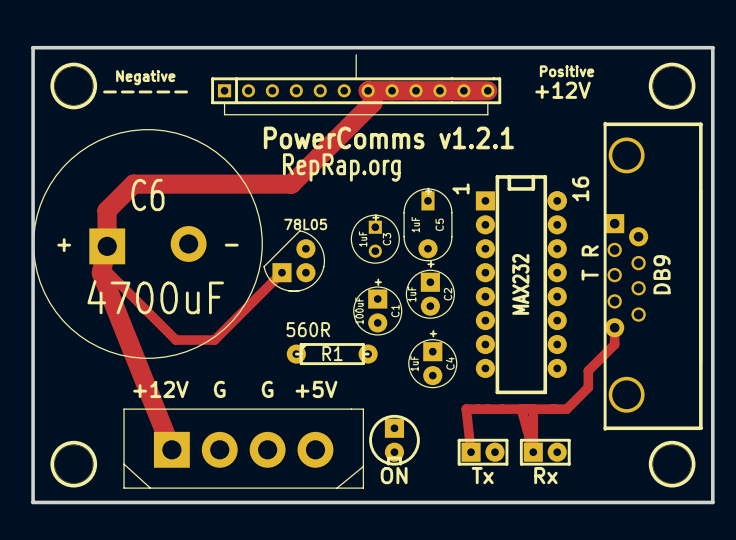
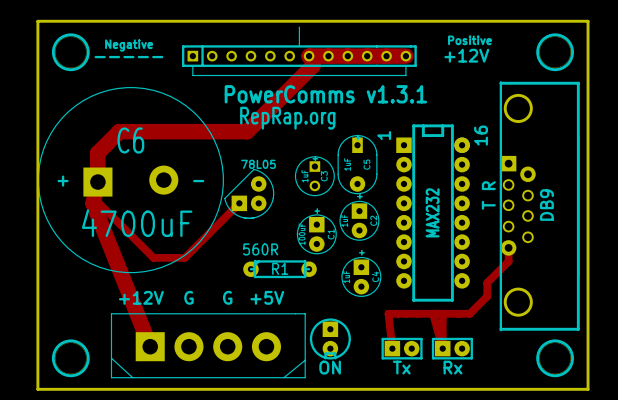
text: PowerComms v1.2.1 (388, 137) -> PowerComms v1.3.1 (325, 94)

